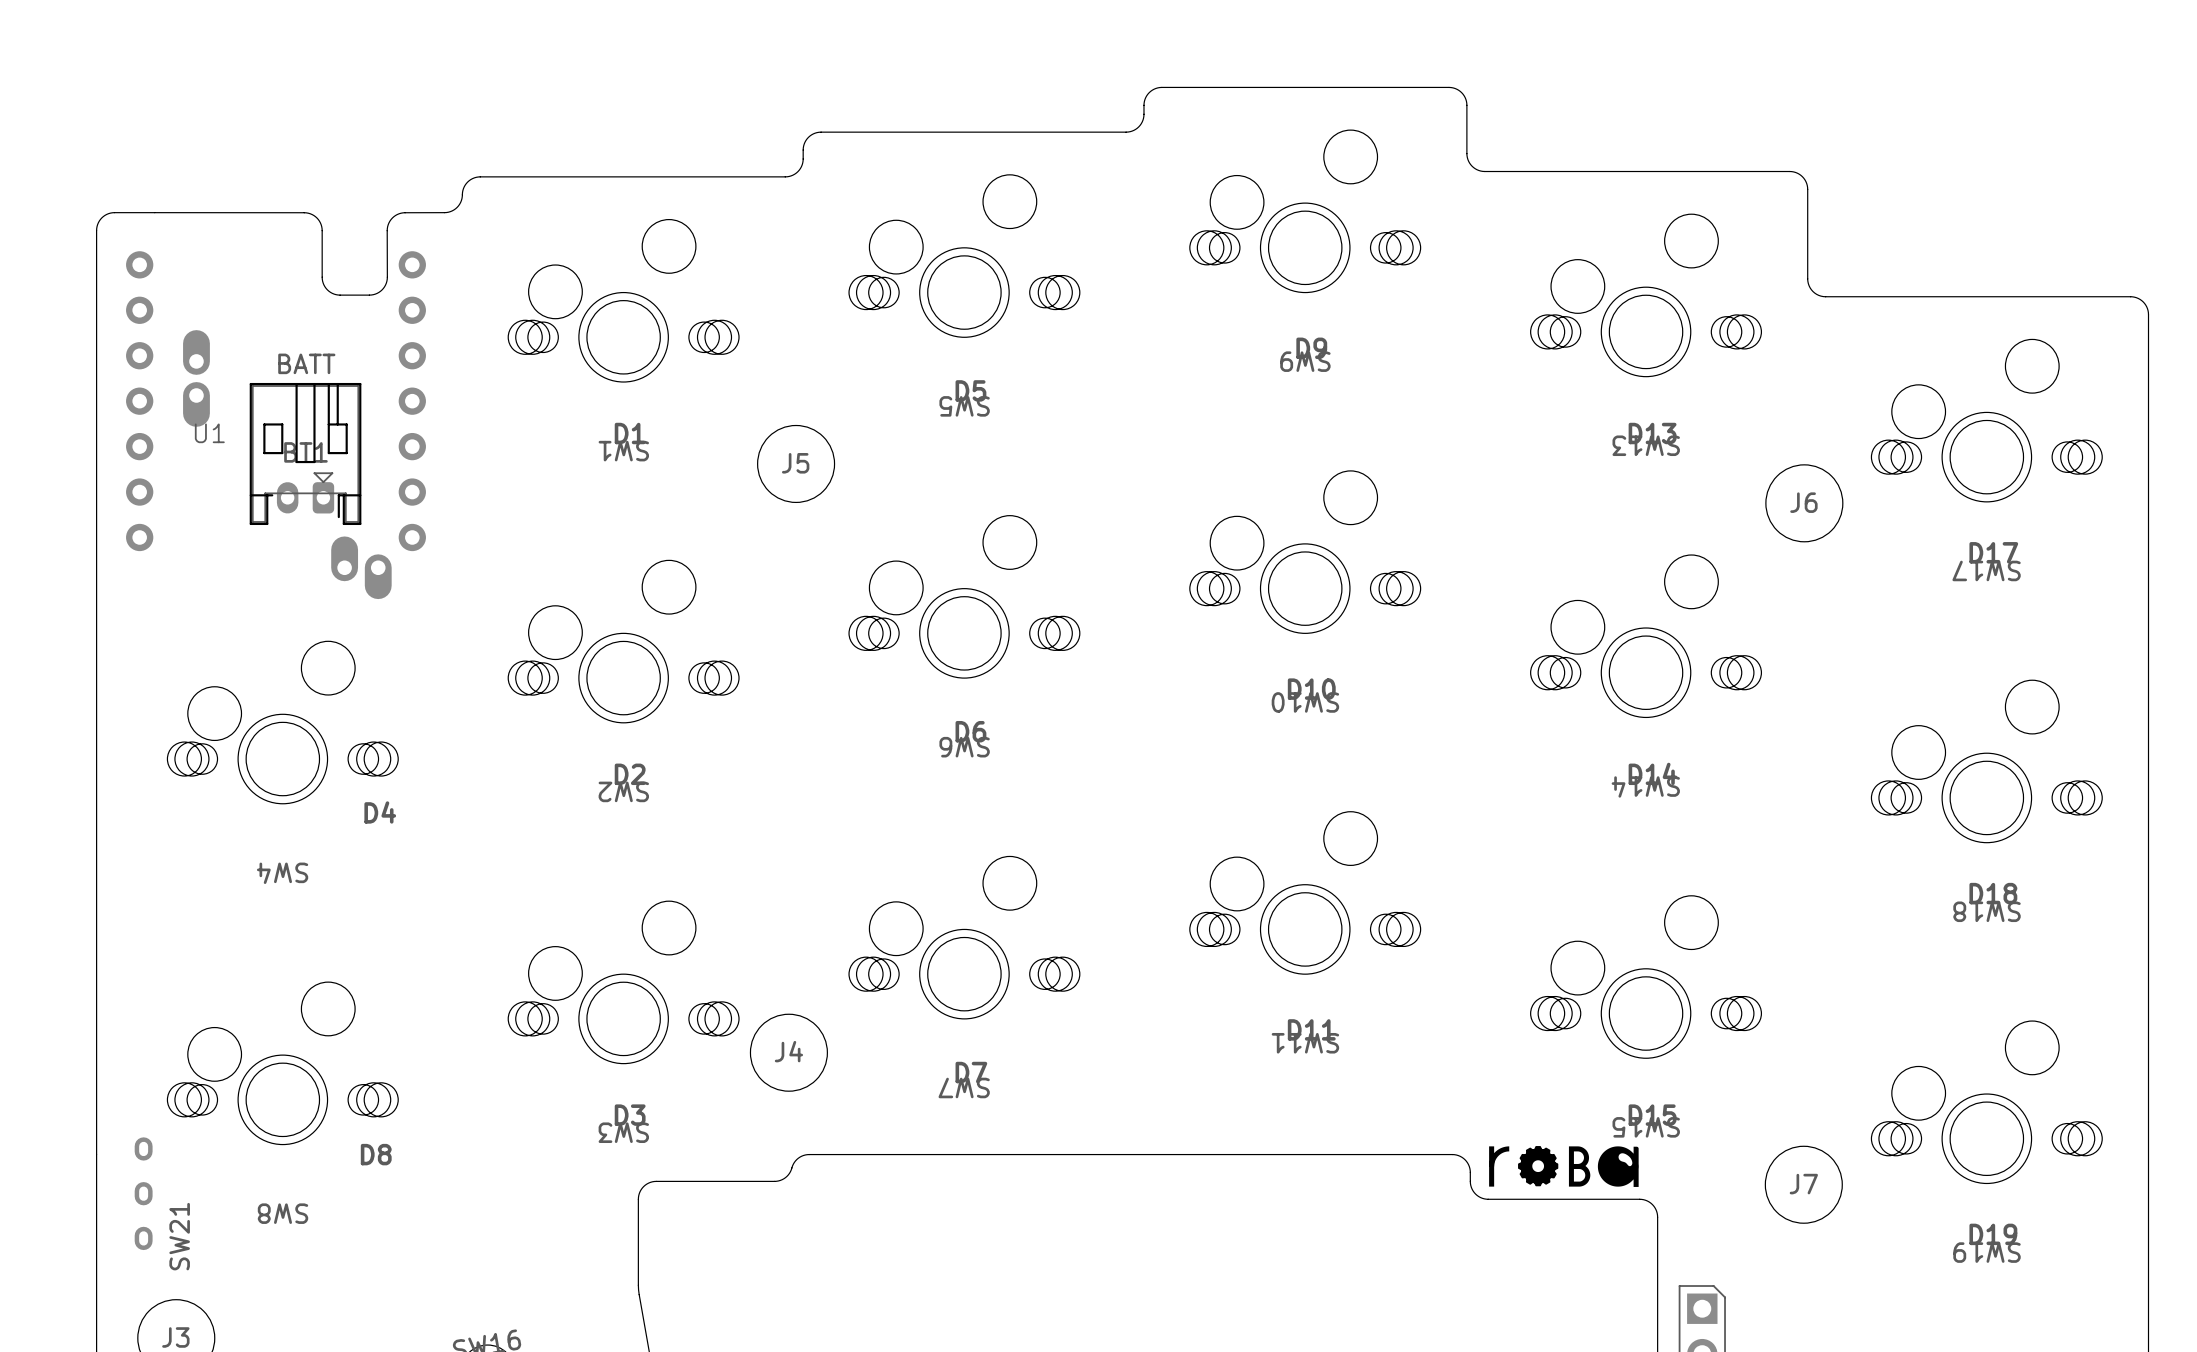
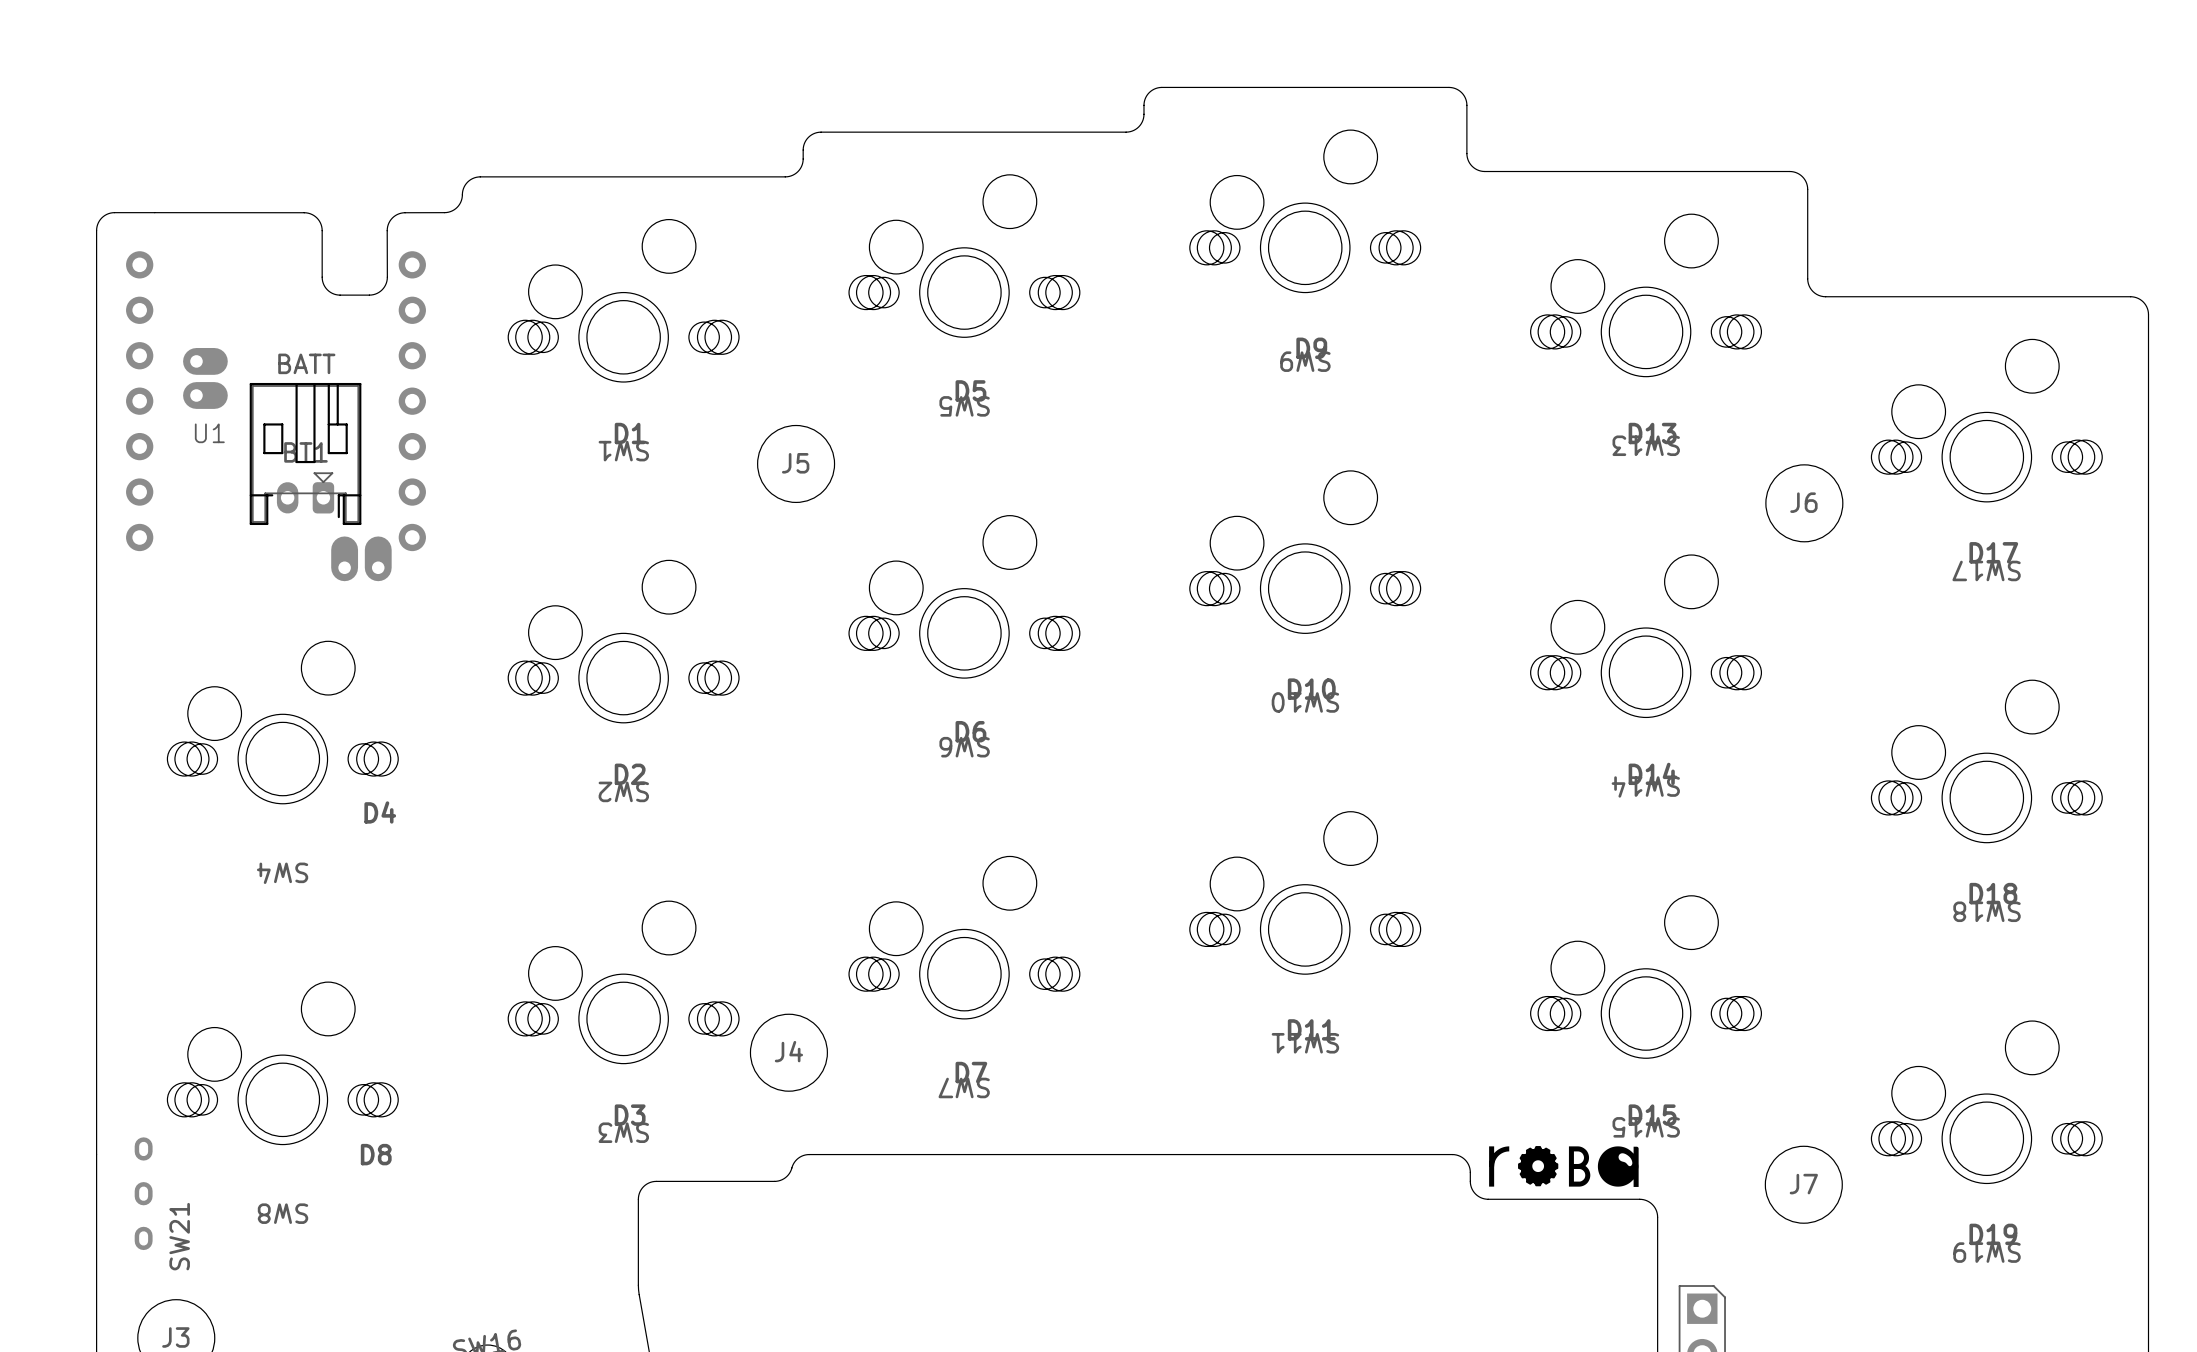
U1 footprint: [126, 251, 426, 600] -> [126, 251, 426, 582]

